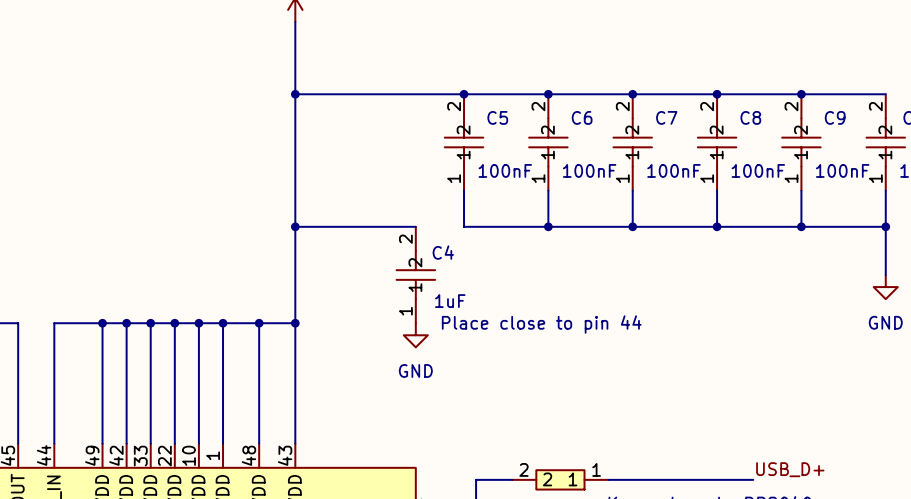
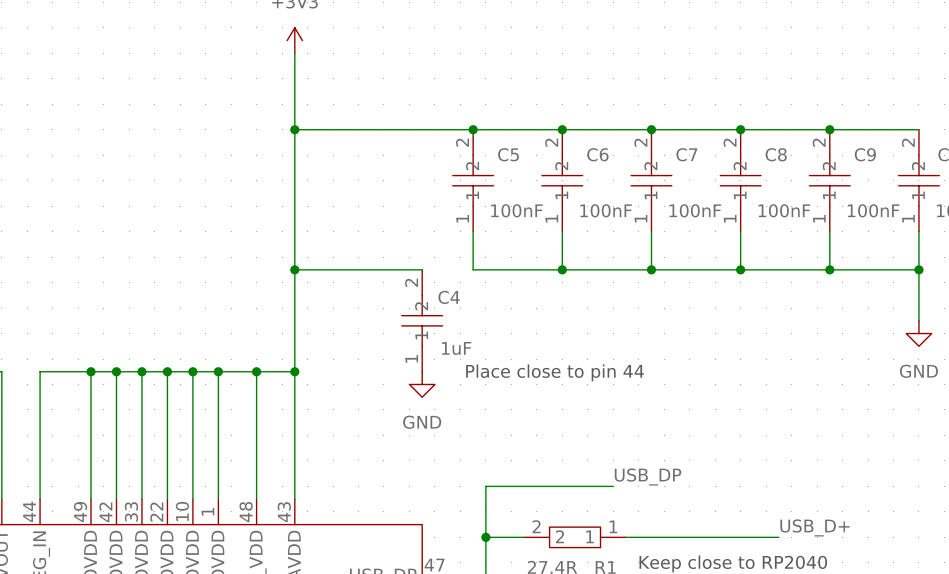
label: none -> USB_DP (648, 476)
wire: none -> (613, 486) (485, 486) (485, 537)
junction: none -> (485, 537)

